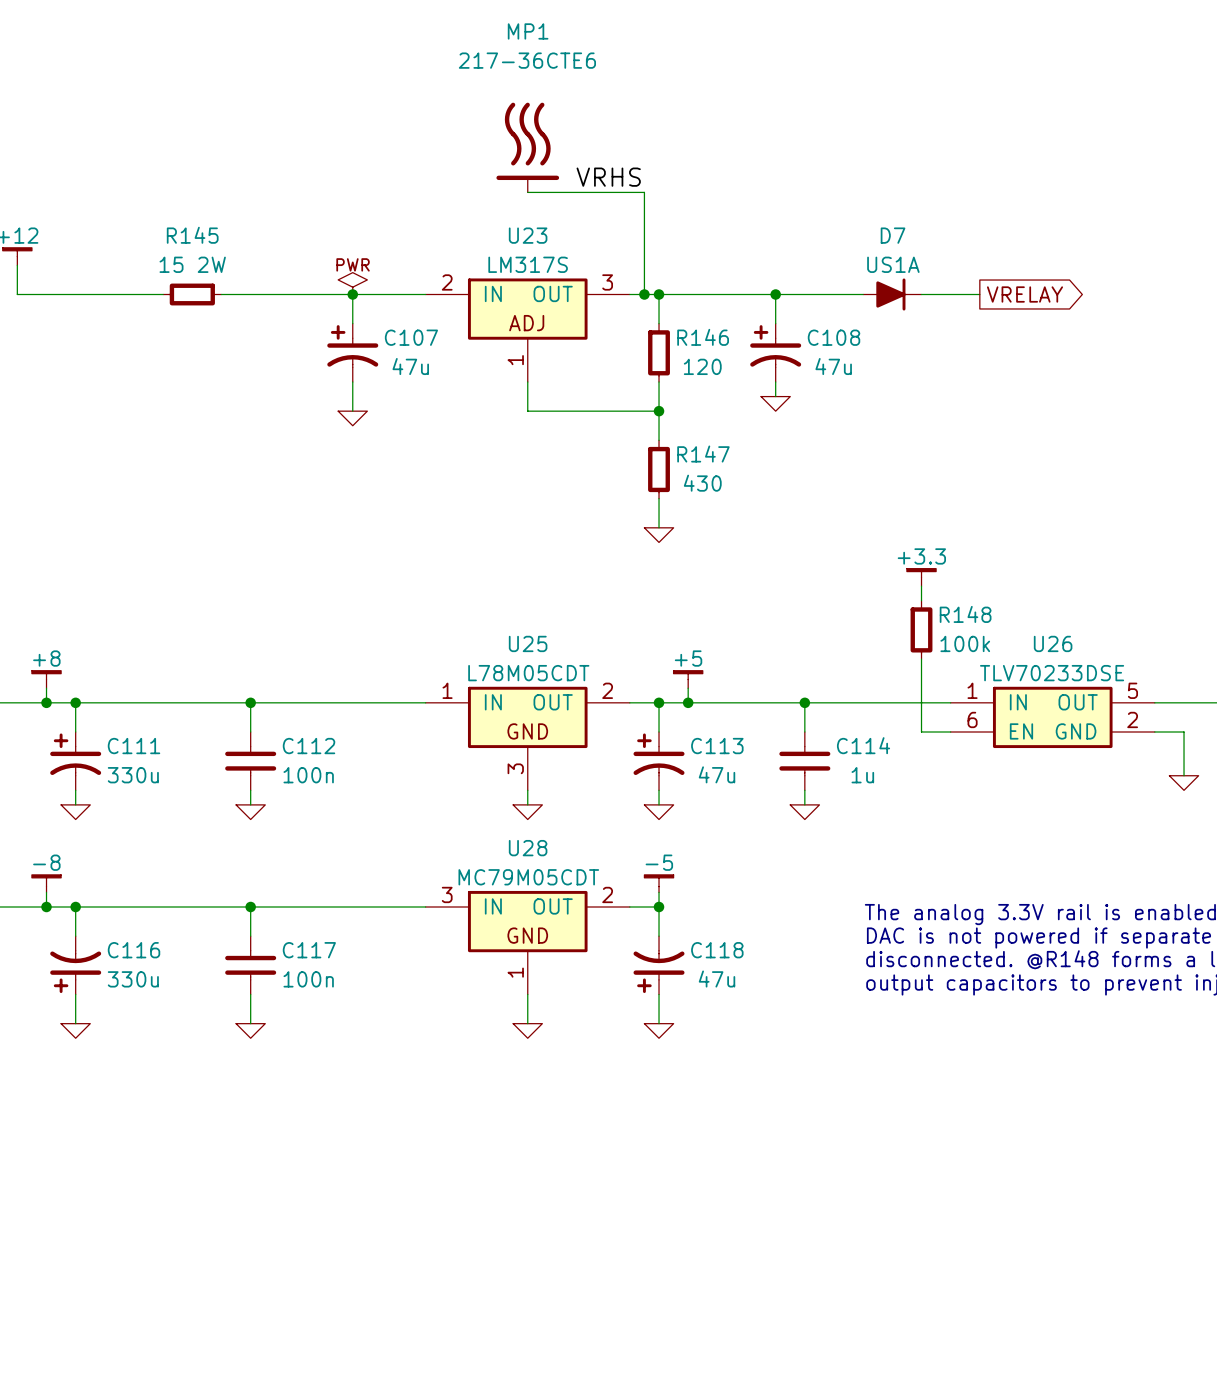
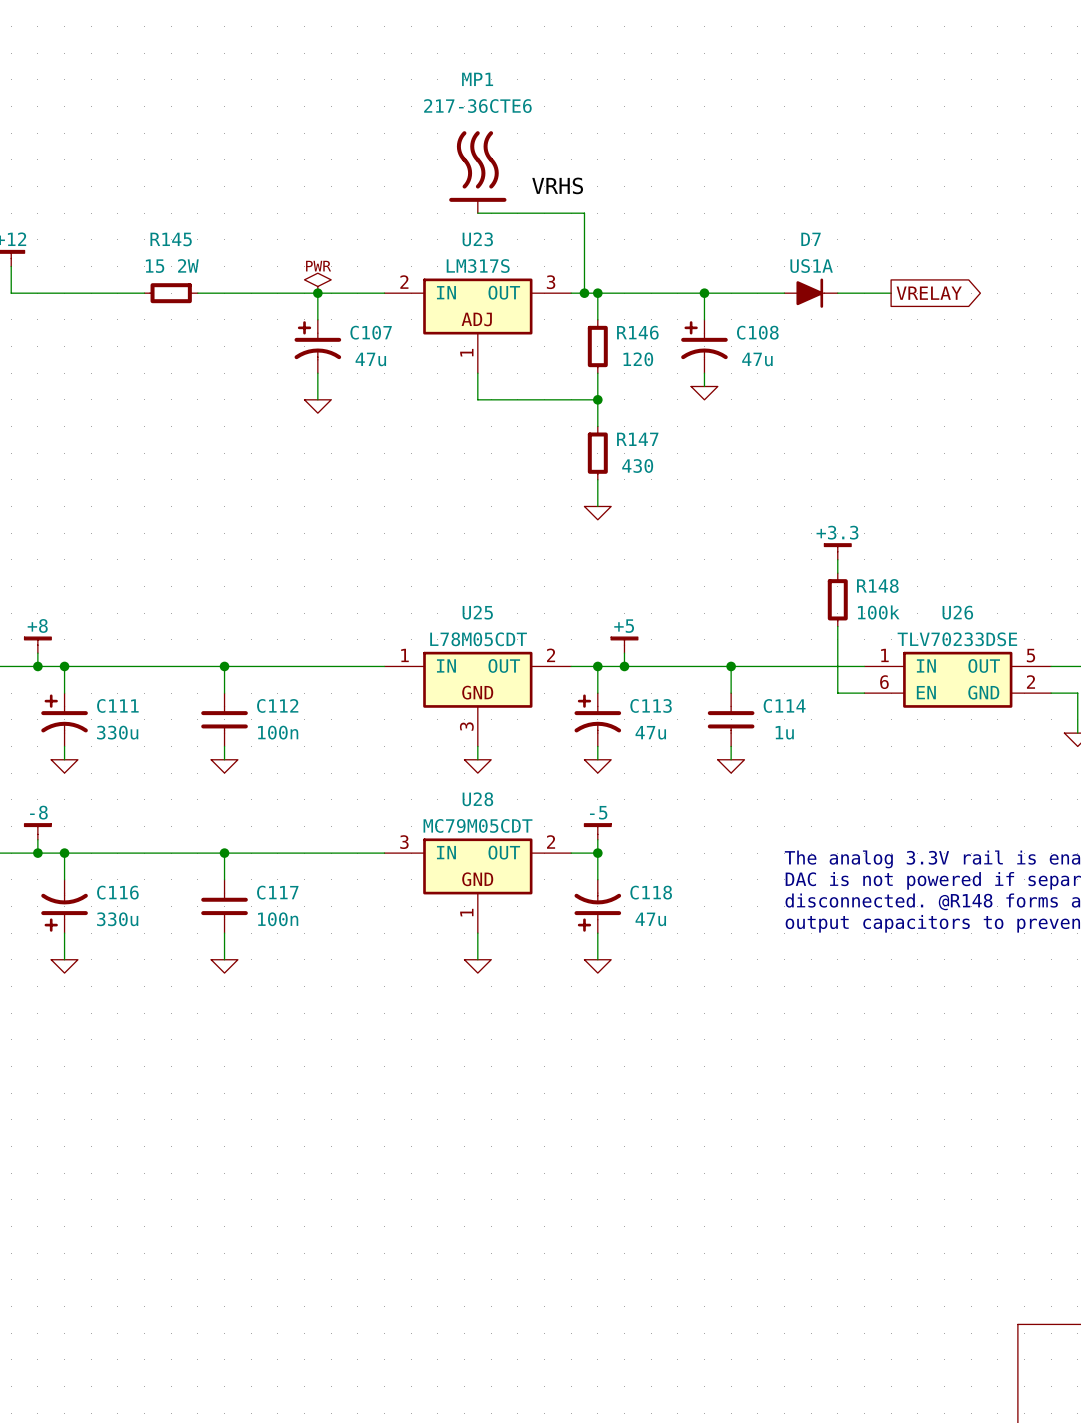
MP1 name position: MP1 (528, 31) -> MP1 (477, 79)
MP1 value position: 217-36CTE6 (527, 60) -> 217-36CTE6 (477, 106)
MP1 position: (527, 147) -> (477, 172)
wire: (527, 192) (644, 192) (644, 207) -> (477, 213) (584, 213)

